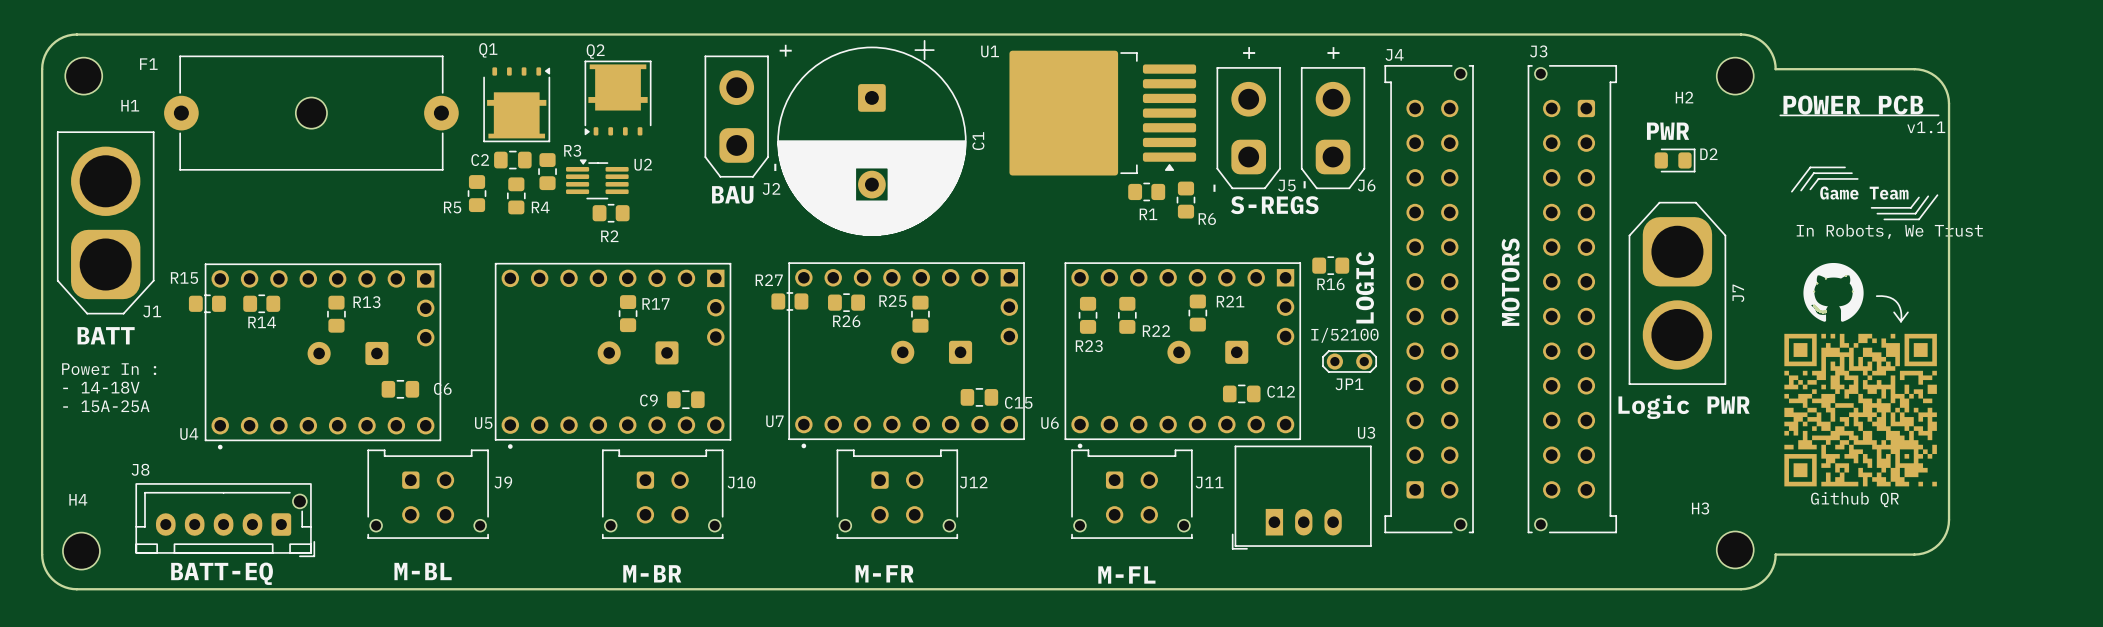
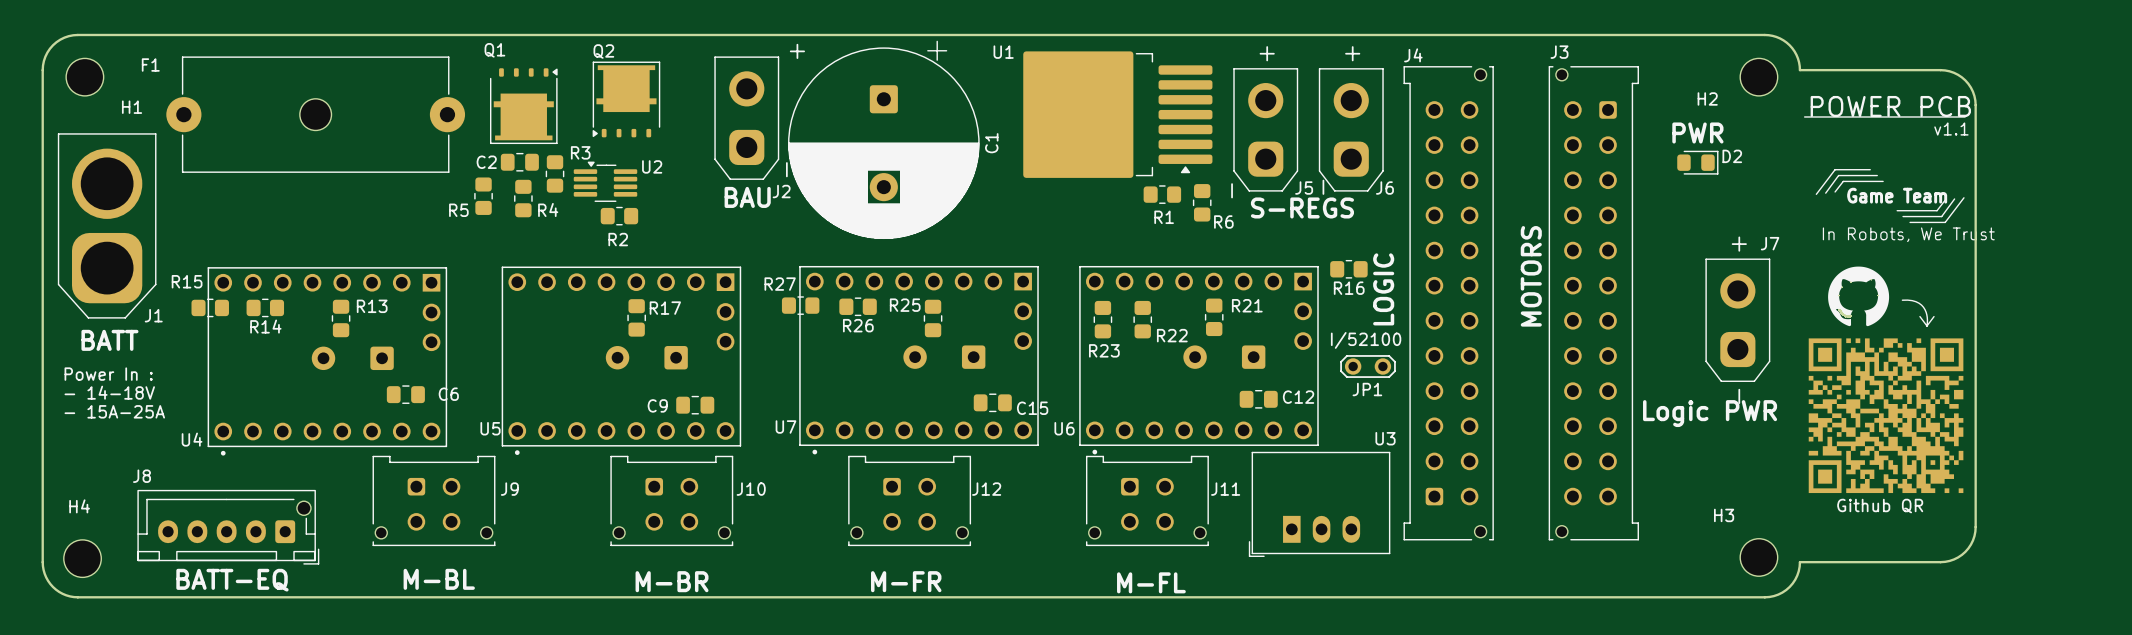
J7 footprint: [1628, 201, 1727, 385] -> [1705, 258, 1771, 382]
J7 name position: J7 (1738, 293) -> J7 (1770, 243)

